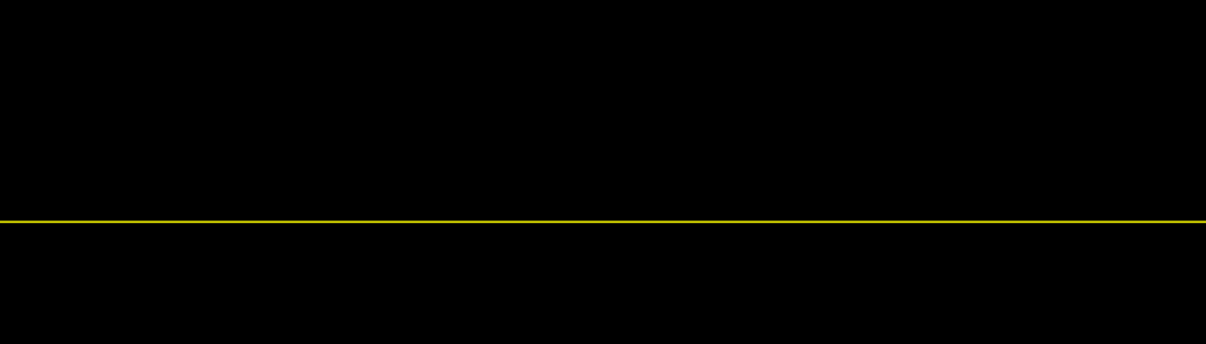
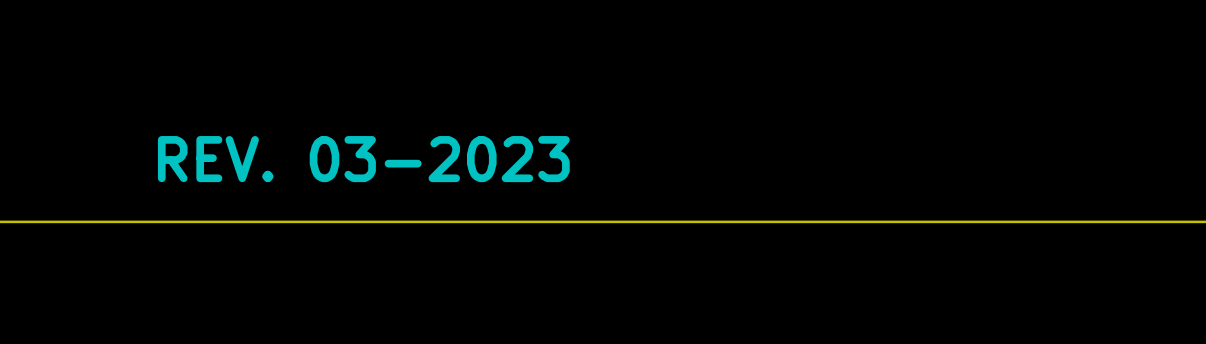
text: none -> REV. 03-2023 (363, 159)

